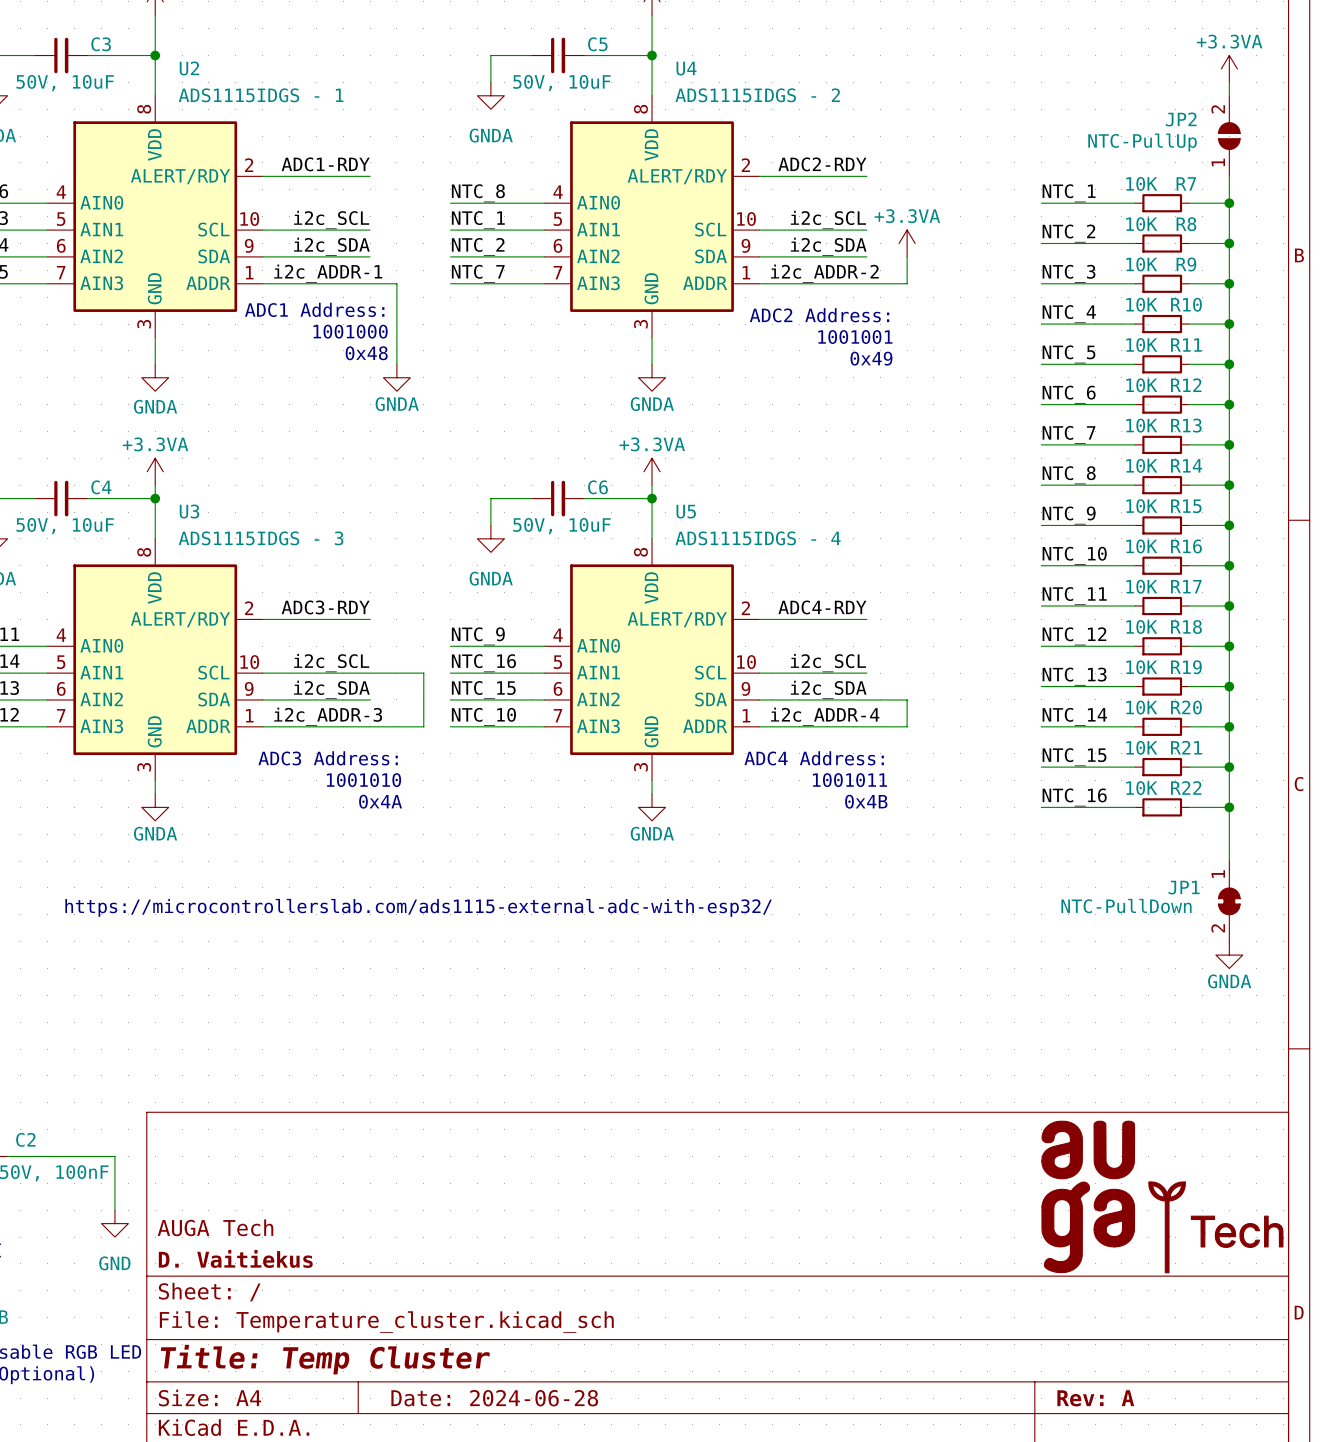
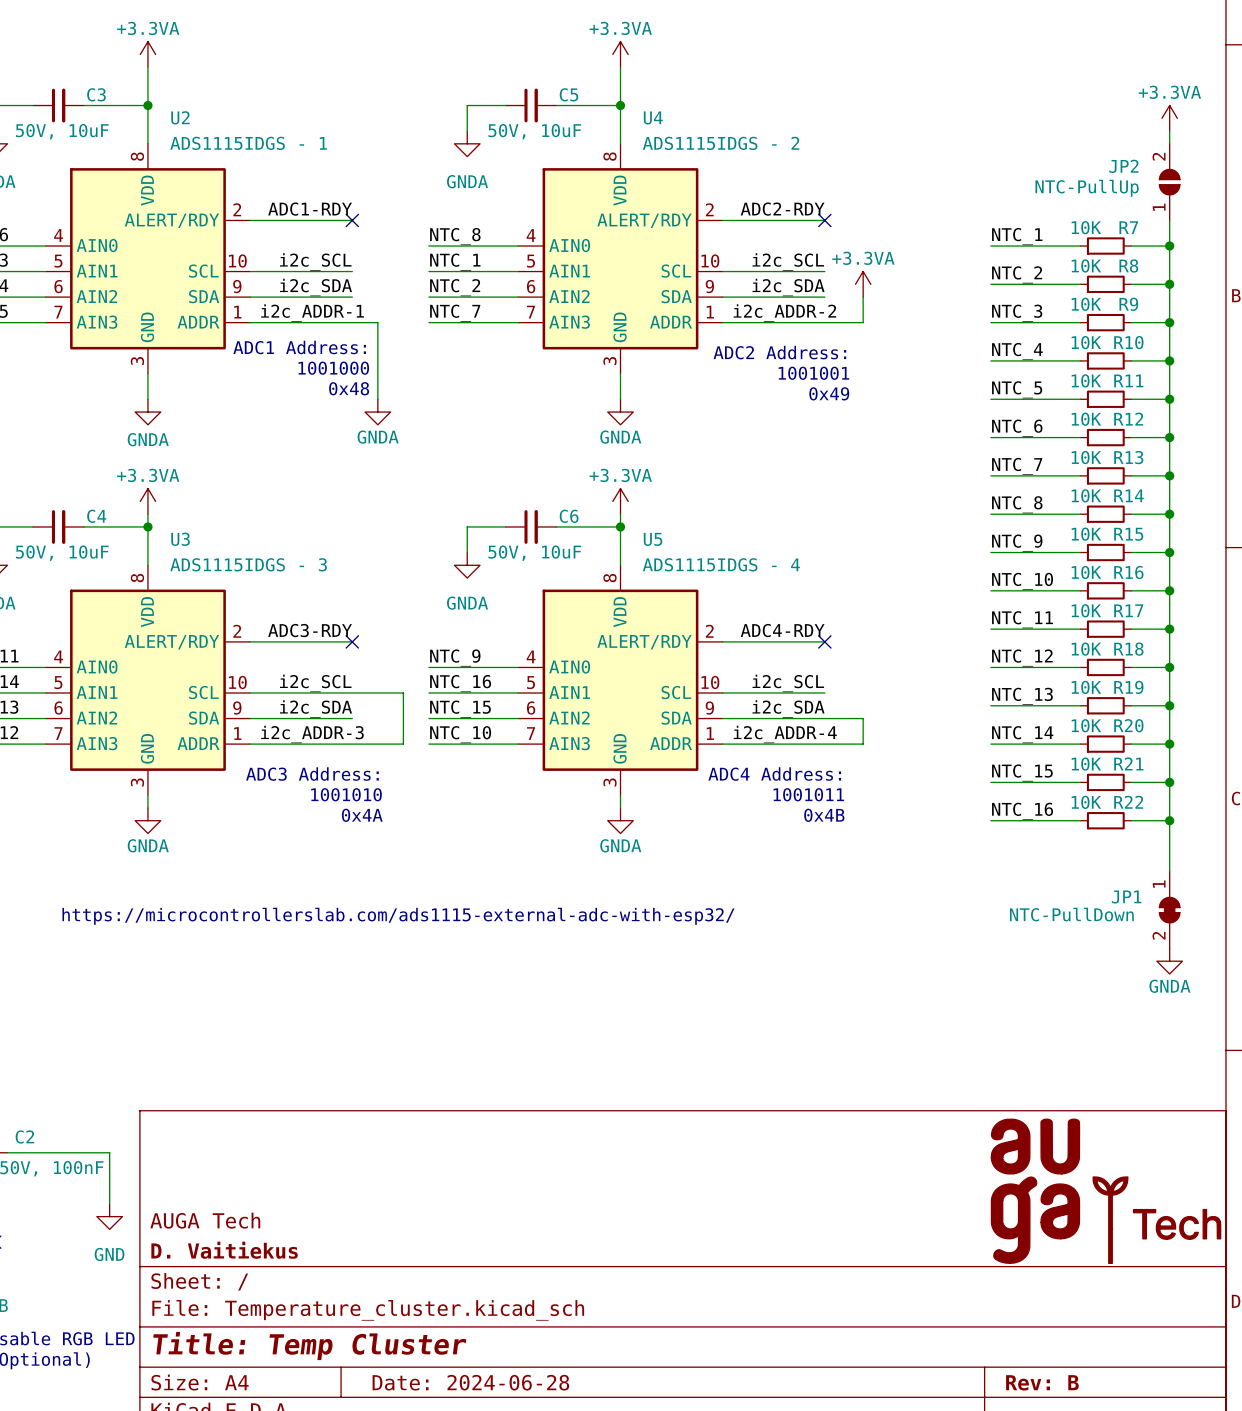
no-connect mark: none -> (352, 220)
no-connect mark: none -> (824, 220)
no-connect mark: none -> (352, 641)
no-connect mark: none -> (824, 641)
title block: Rev: A (1095, 1398) -> Rev: B (1042, 1382)

